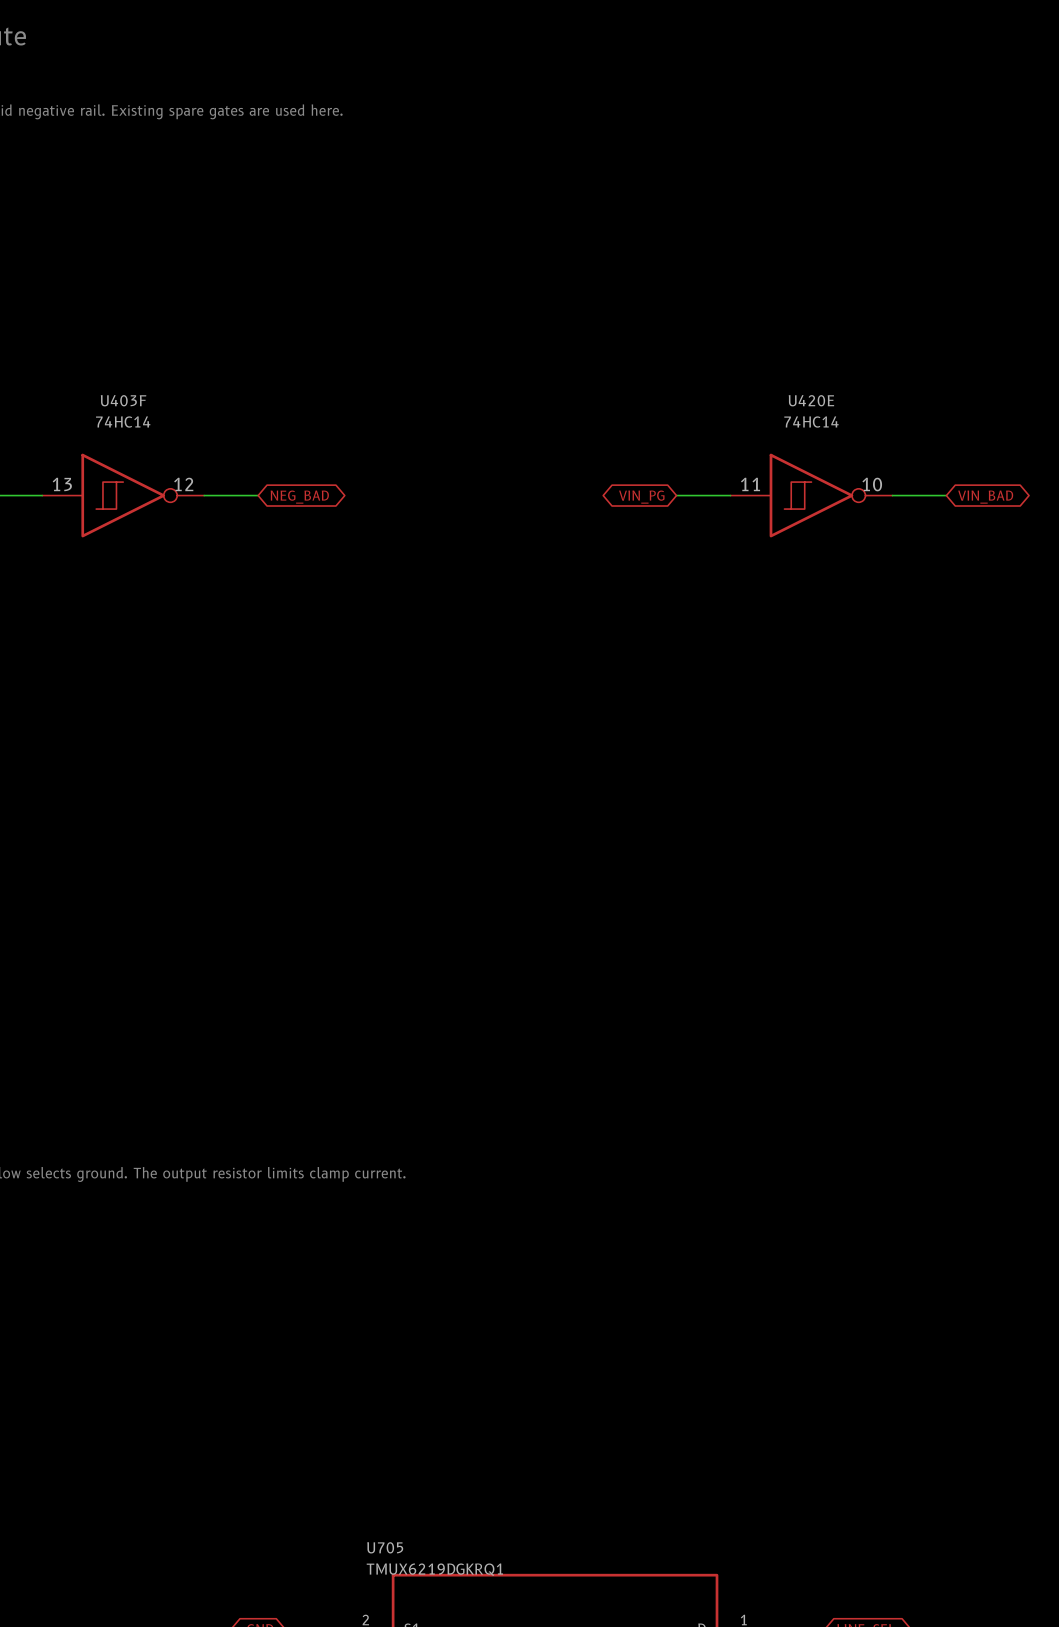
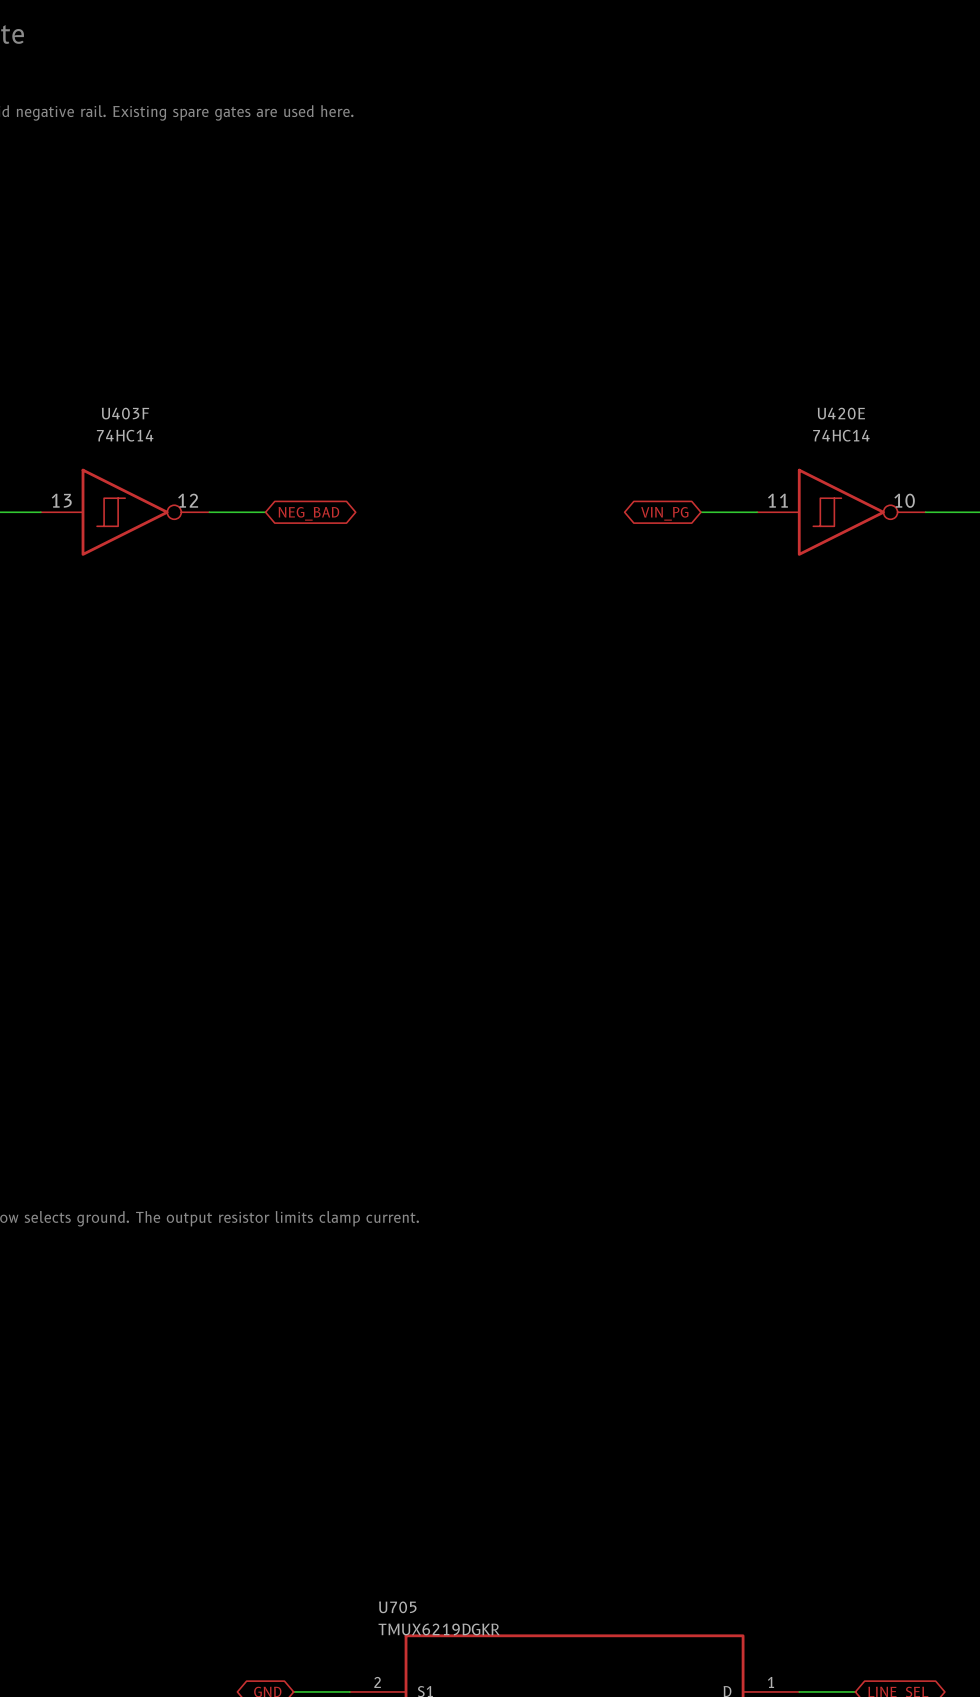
U705 value: TMUX6219DGKRQ1 (434, 1569) -> TMUX6219DGKR (439, 1629)

